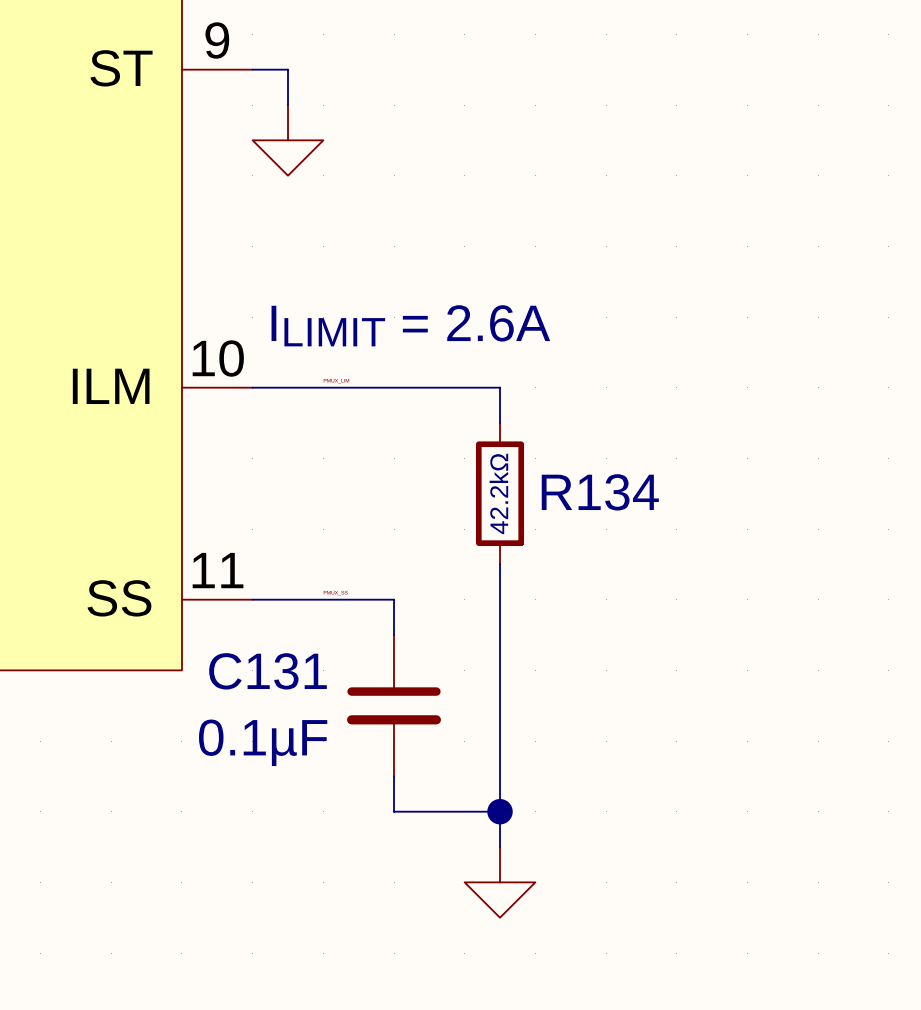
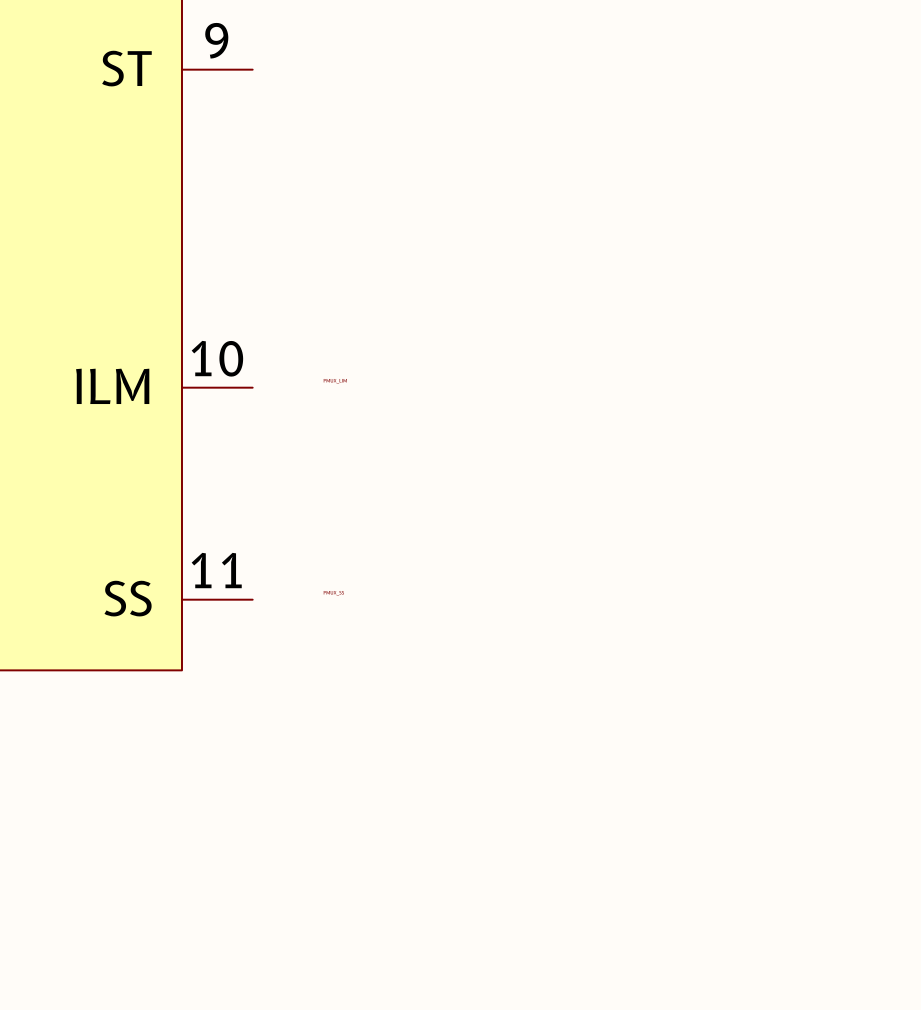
wire: (252, 69) (288, 69) (288, 105) -> none
power symbol: (288, 140) -> none
text: ILIMIT = 2.6A (410, 325) -> none
wire: (252, 387) (500, 387) (500, 423) -> none
R134: 42.2kΩ (500, 493) -> none
wire: (500, 564) (500, 847) -> none
wire: (252, 599) (394, 599) (394, 635) -> none
C131: 0.1µF (394, 705) -> none
wire: (394, 776) (394, 811) (500, 811) -> none
junction: (500, 811) -> none
power symbol: (500, 882) -> none

